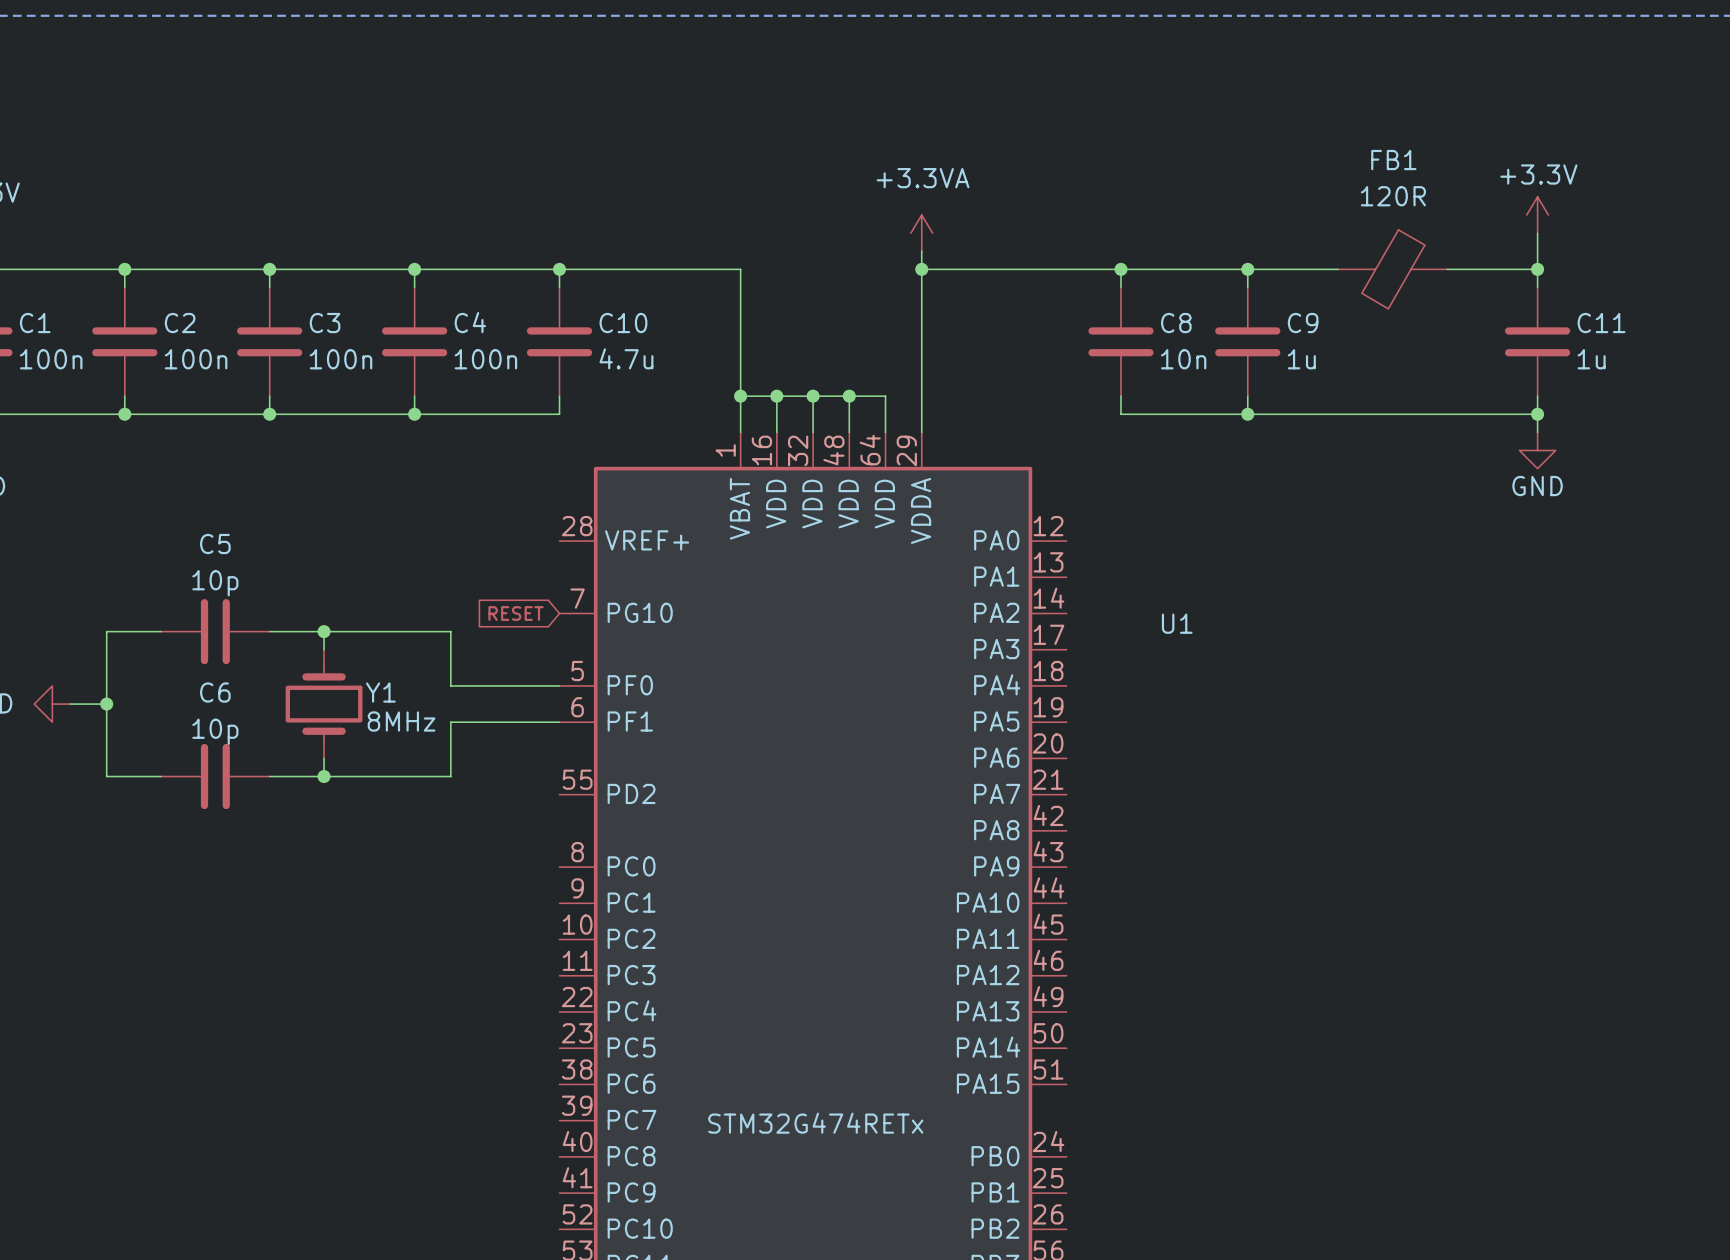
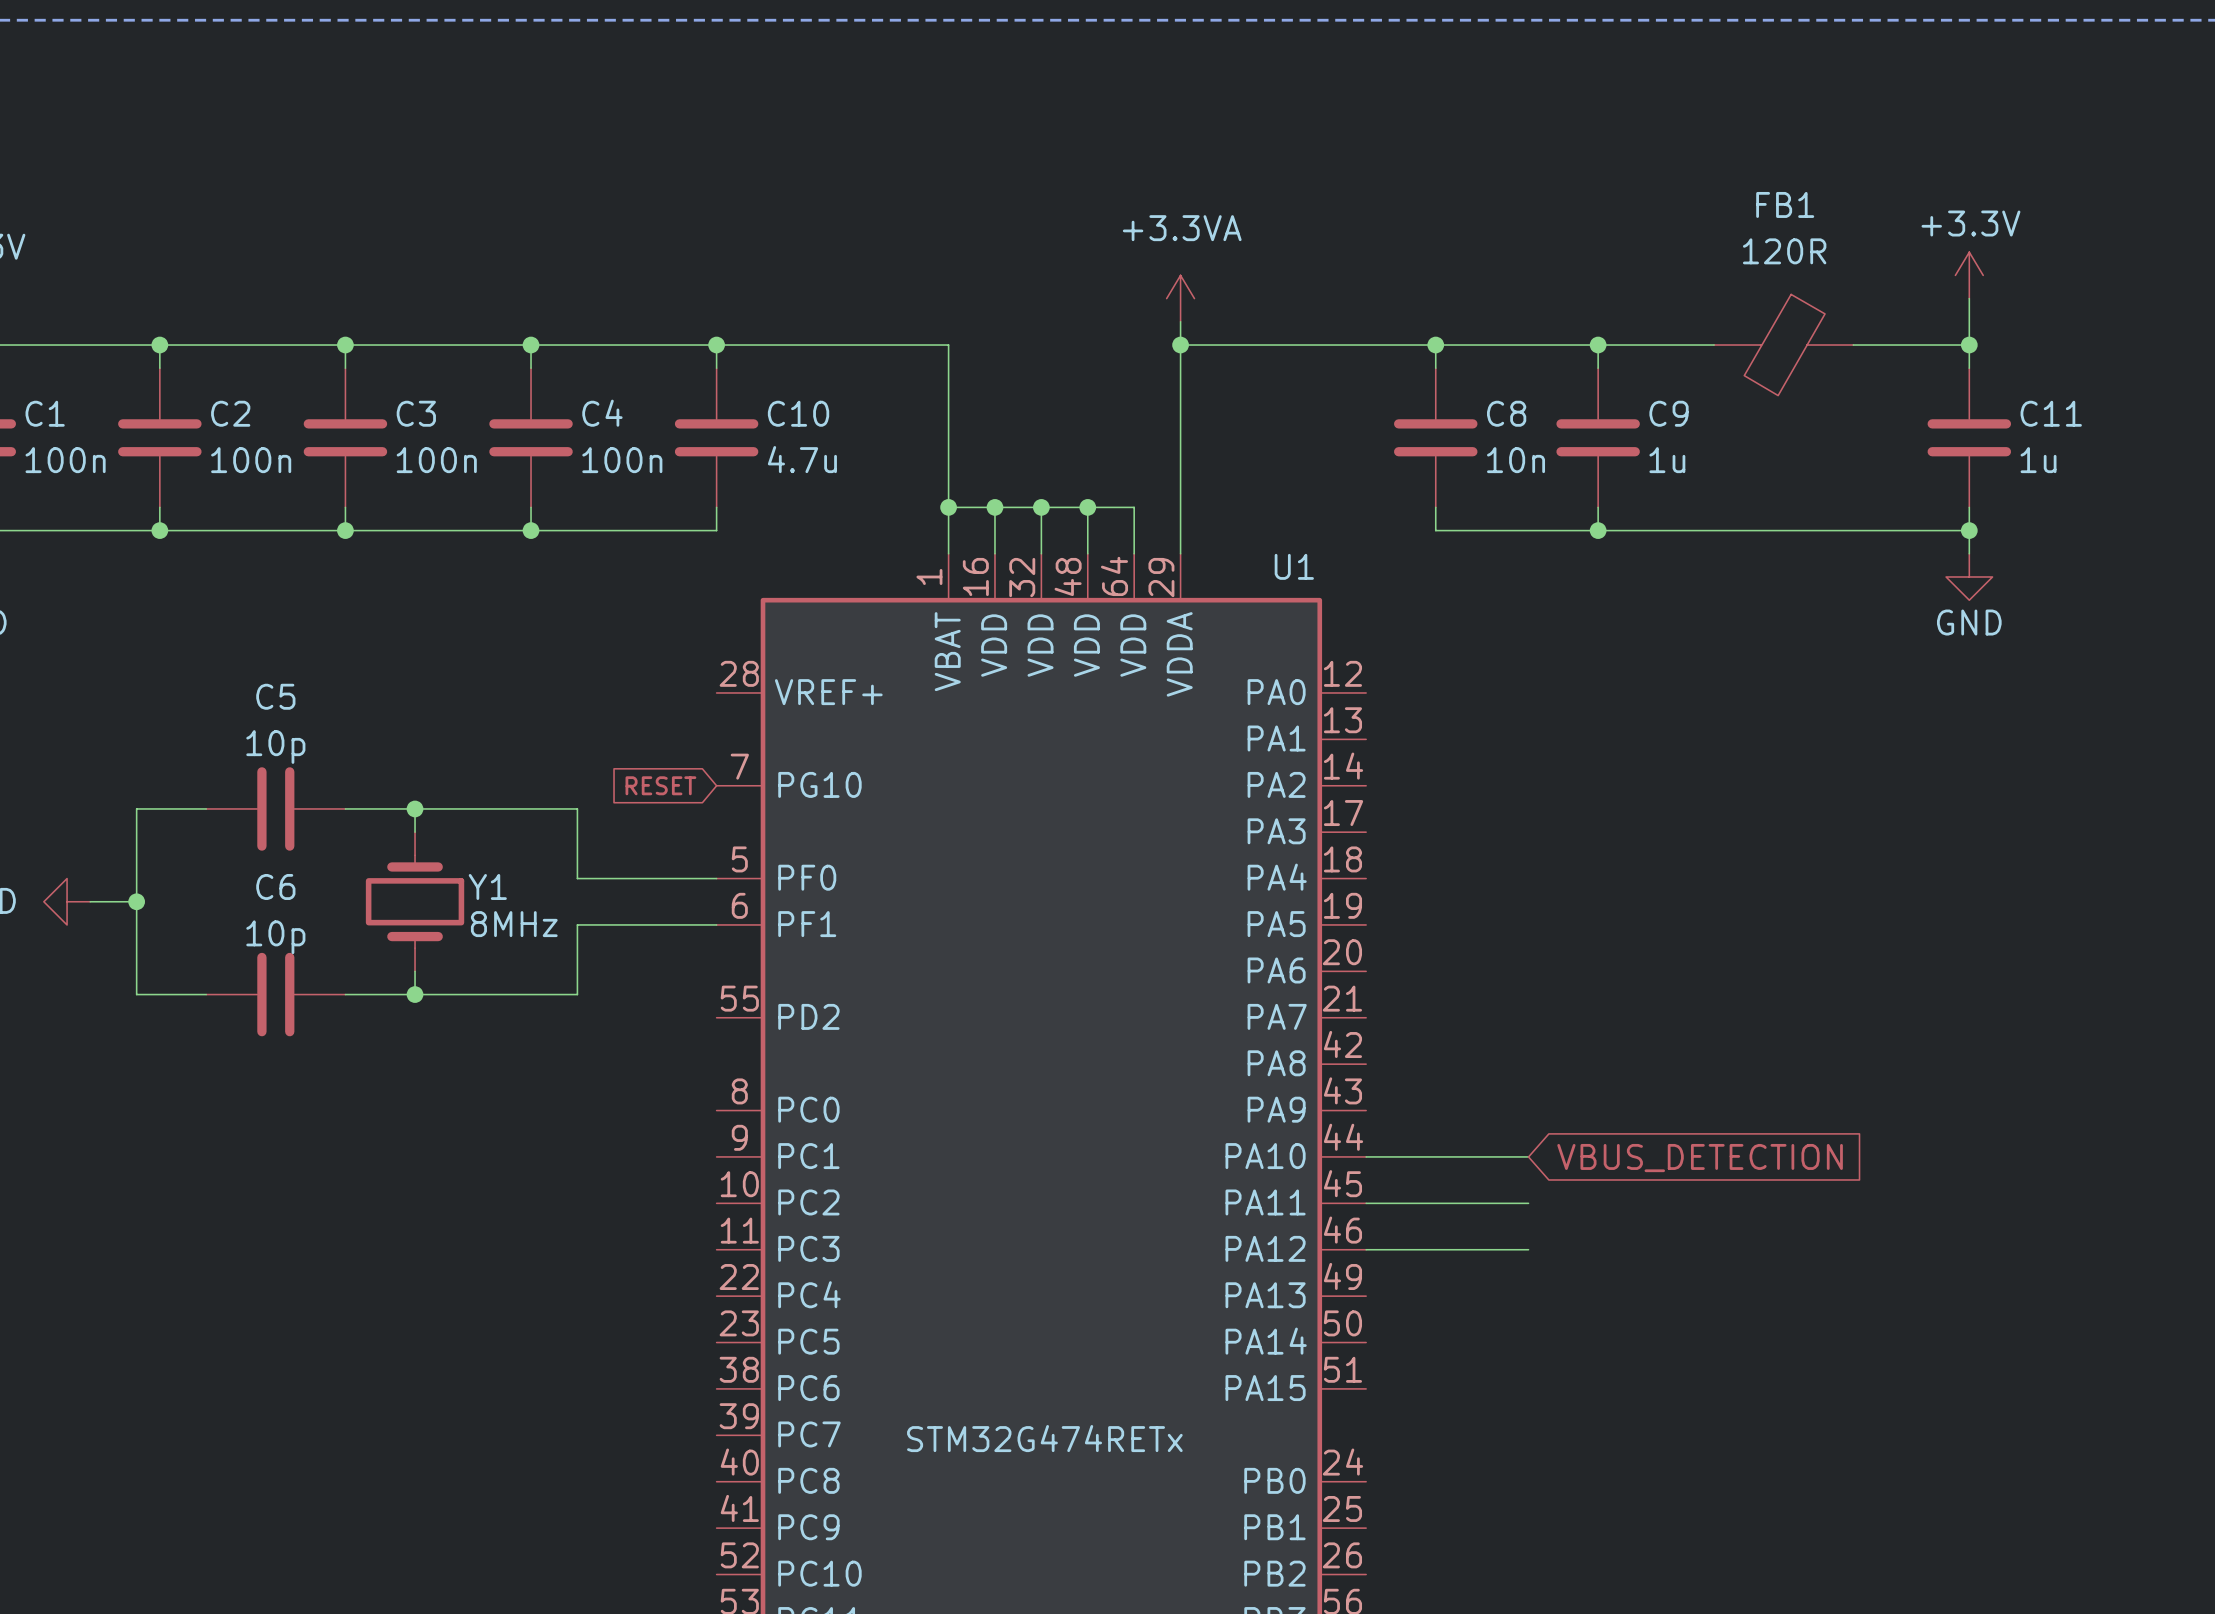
U1 name position: U1 (1177, 623) -> U1 (1294, 566)
wire: none -> (1366, 1156) (1528, 1156)
global label: none -> VBUS_DETECTION (1700, 1158)
wire: none -> (1366, 1203) (1528, 1203)
wire: none -> (1366, 1249) (1528, 1249)

